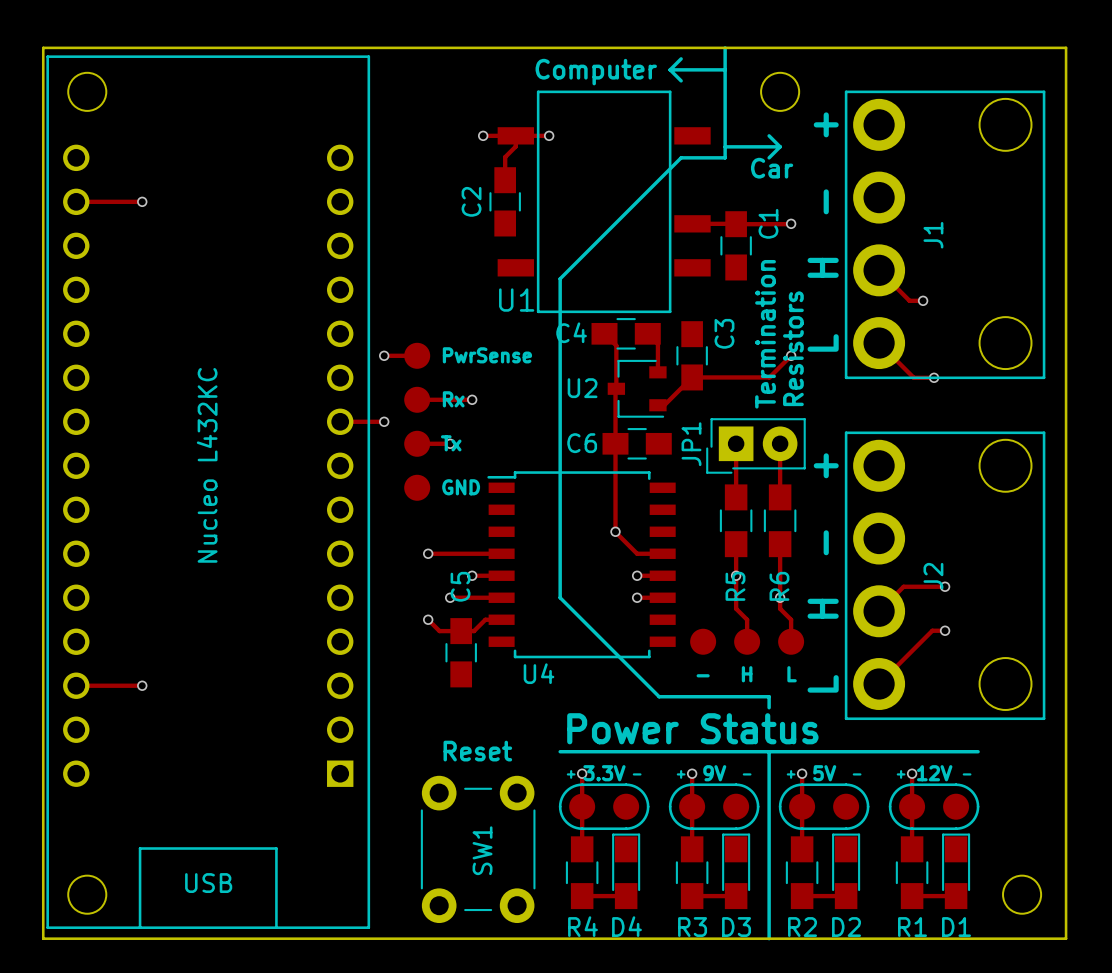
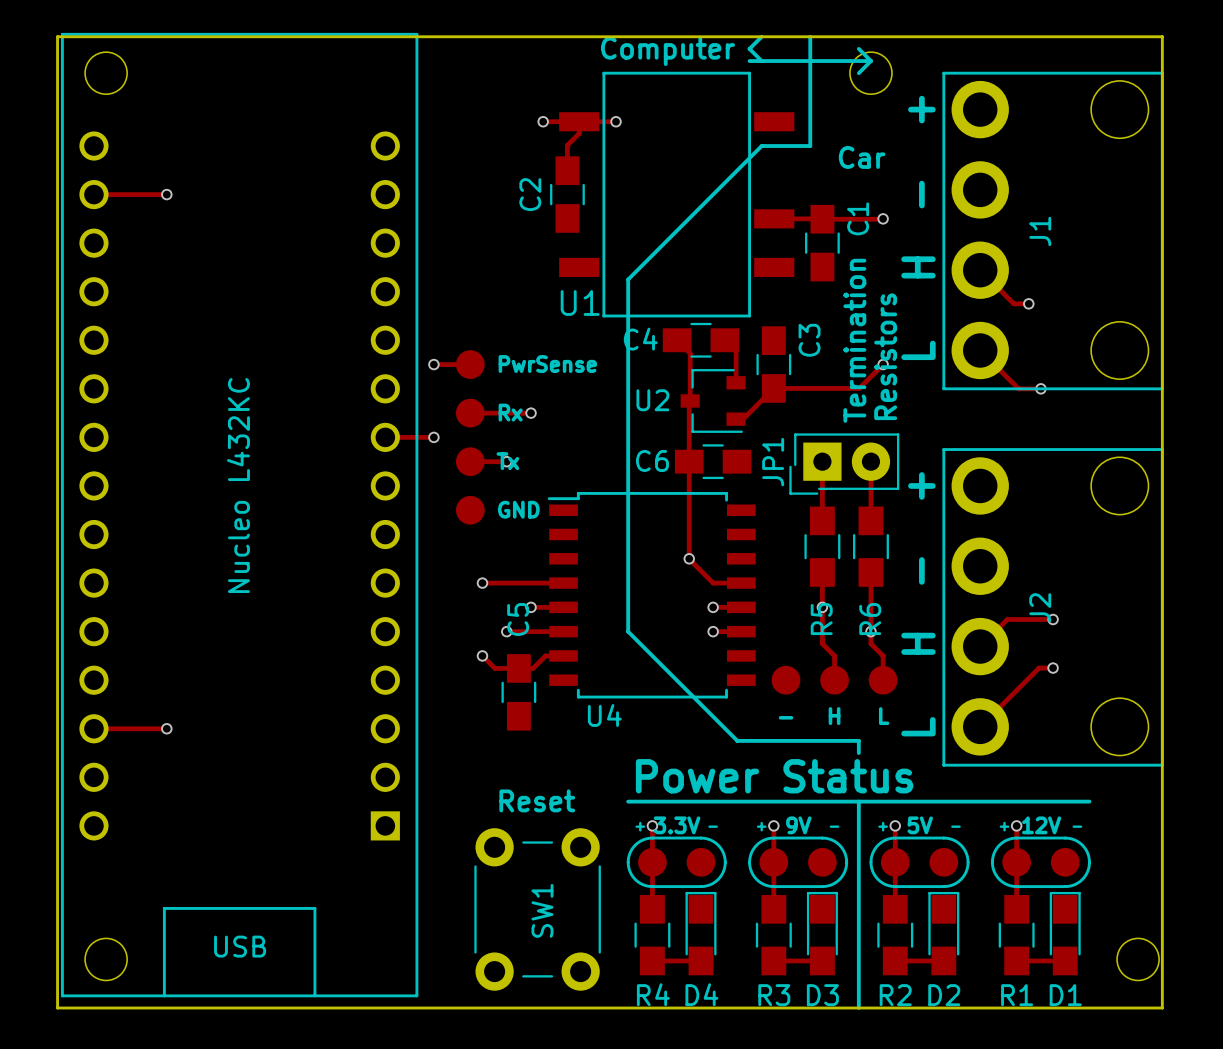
line: (725, 47) (725, 58) -> none
board edge: (43, 58) (43, 47) (1066, 47) (1066, 938) (1044, 938) -> (57, 36) (1162, 36) (1162, 1008)
line: (670, 69) (725, 69) -> none
line: none -> (749, 61) (870, 61)
line: (769, 135) (780, 146) -> (858, 48) (870, 61)
line: (725, 146) (780, 146) -> none
line: (780, 146) (769, 157) -> (870, 61) (858, 73)

